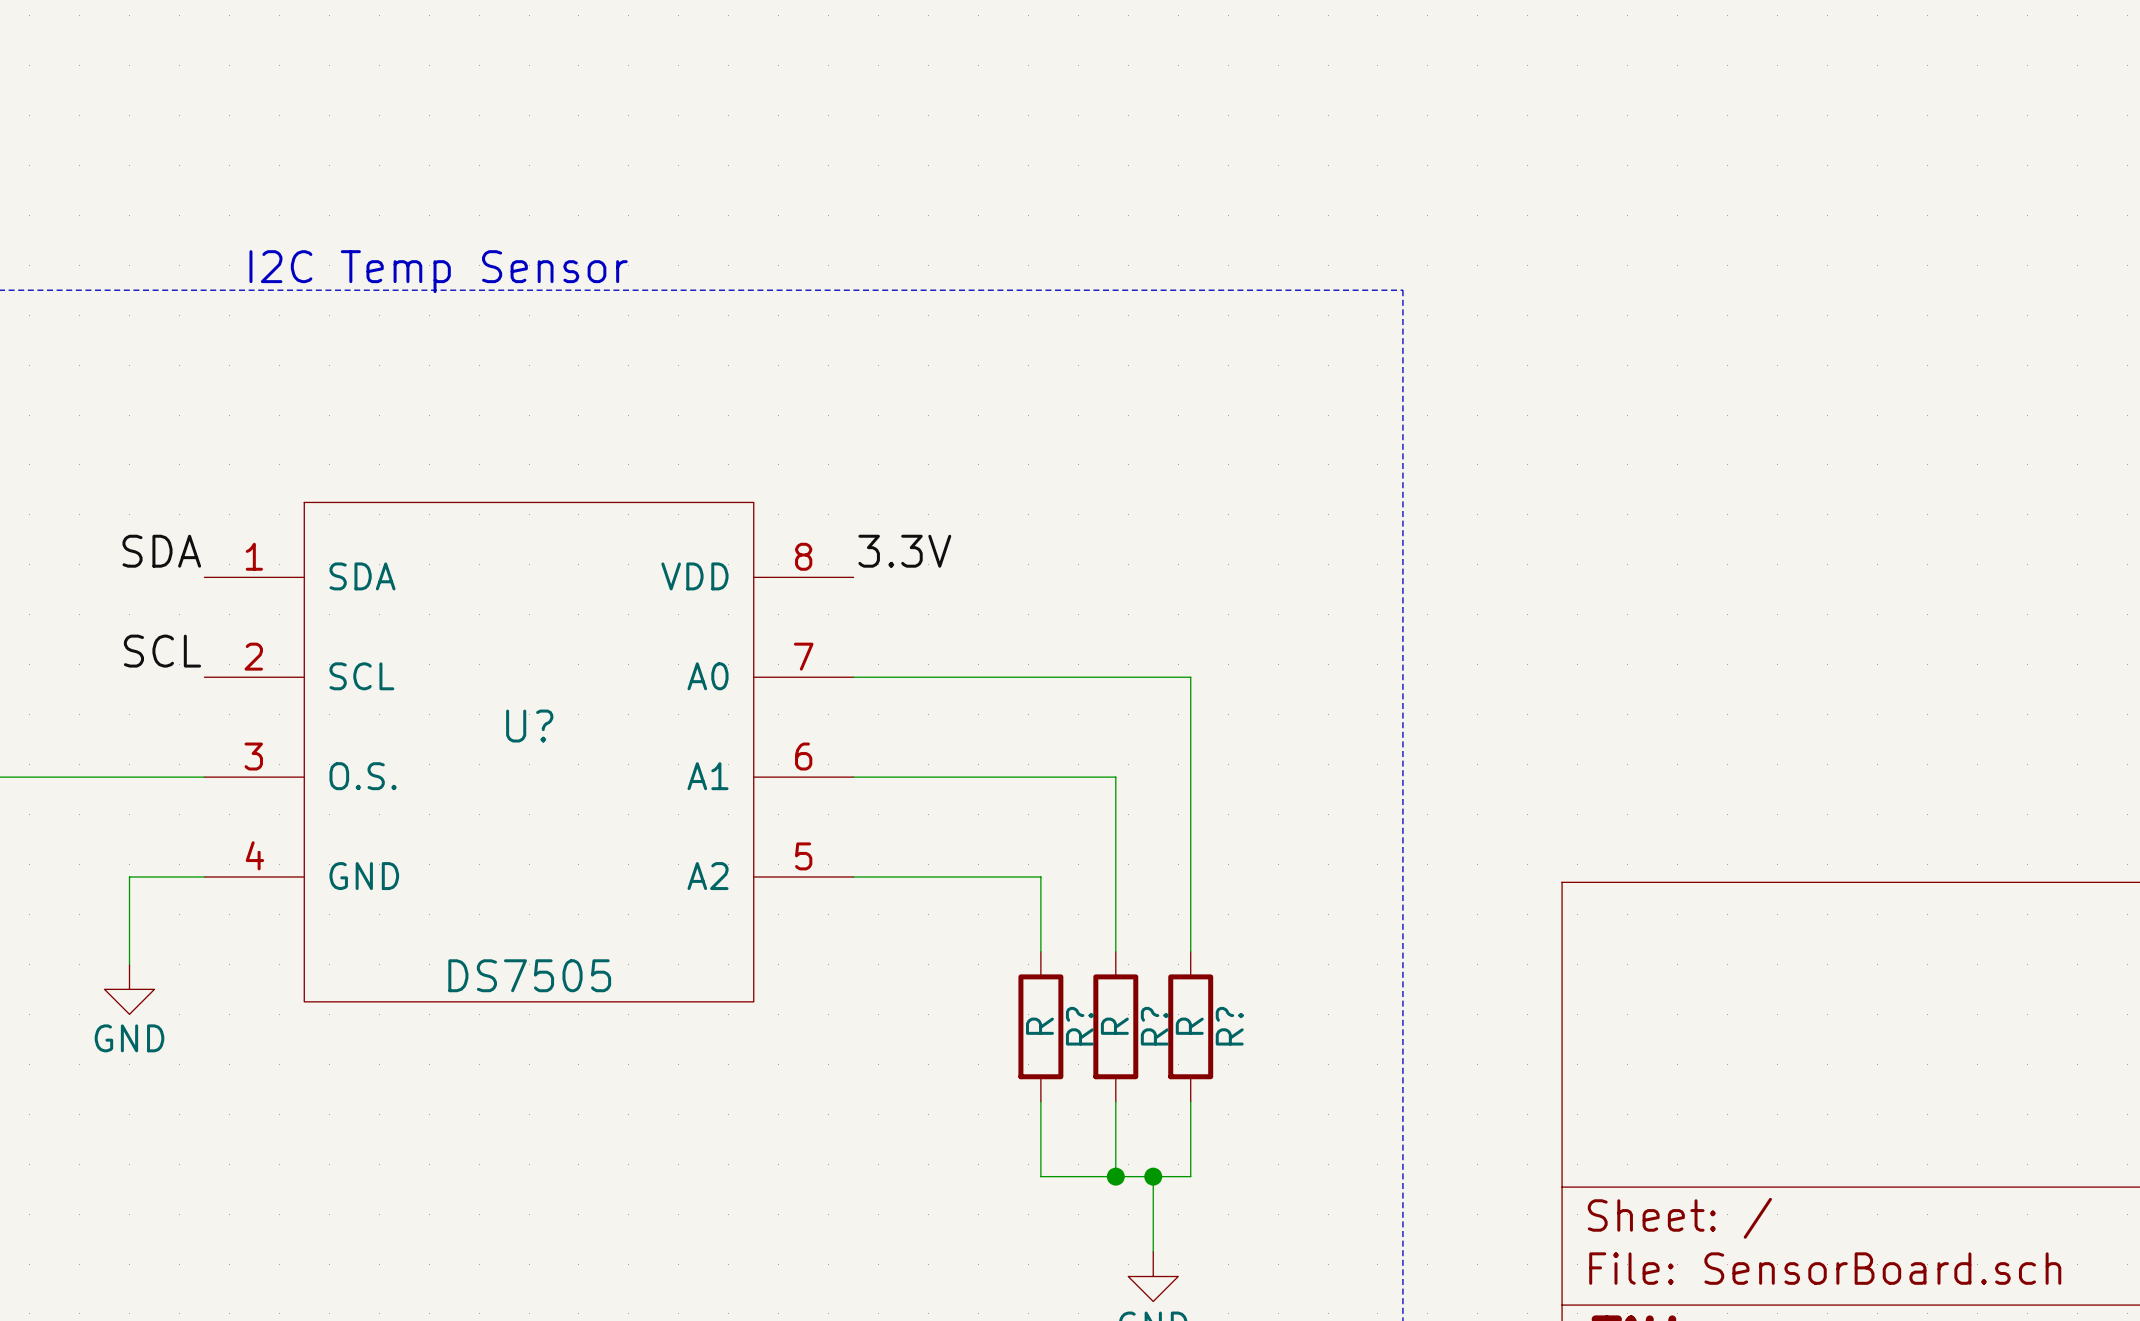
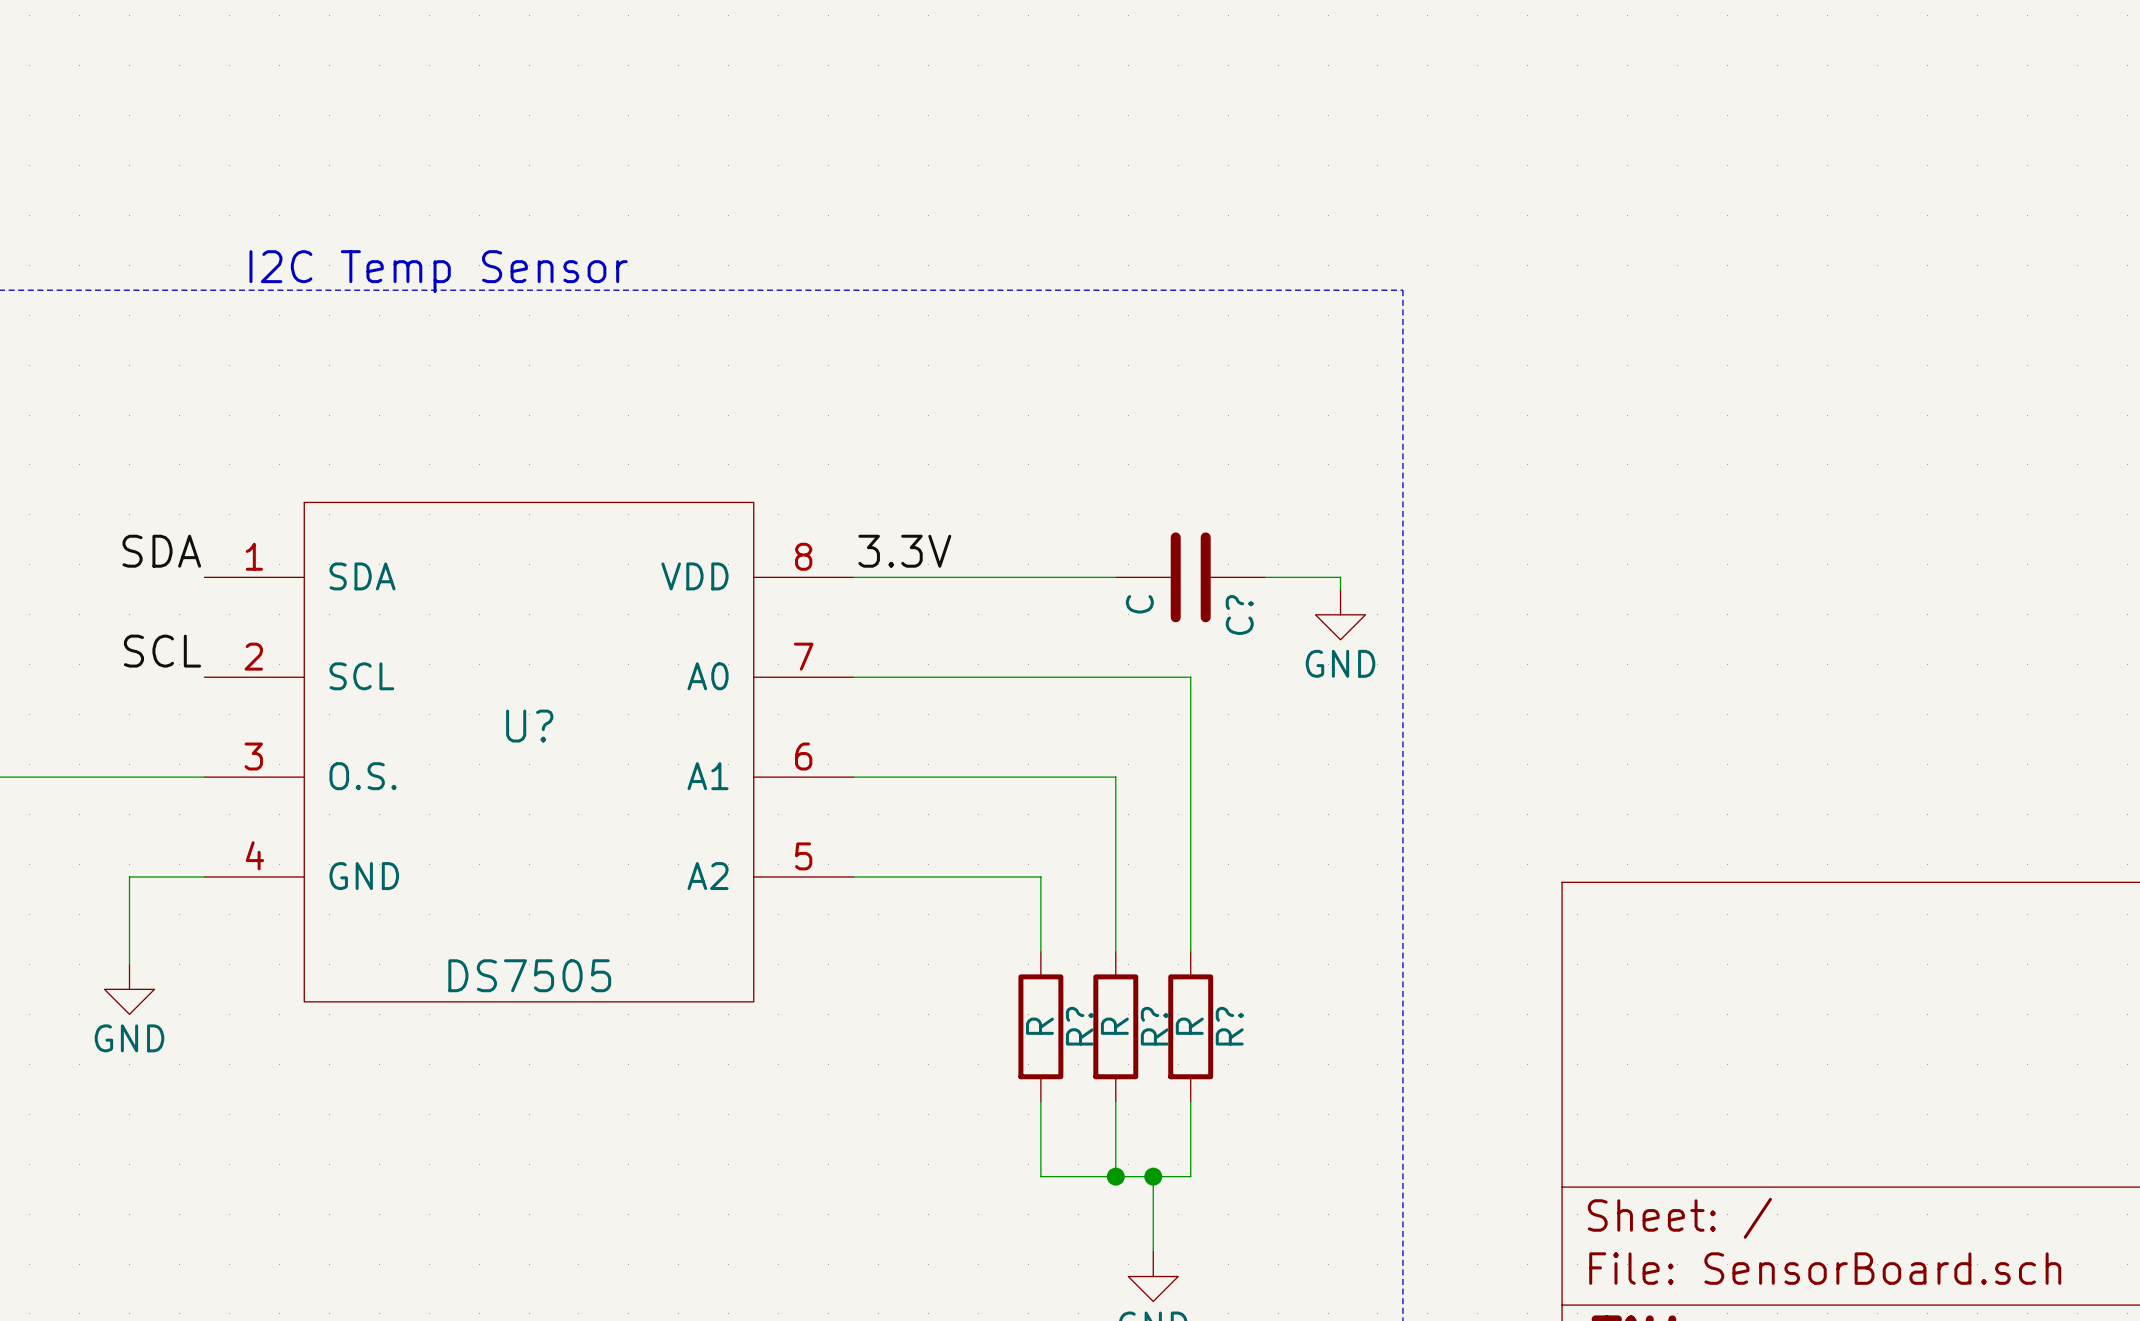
wire: none -> (853, 577) (1115, 577)
C?: none -> C (1190, 577)
wire: none -> (1265, 577) (1340, 577) (1340, 589)
power symbol: none -> GND (1340, 614)

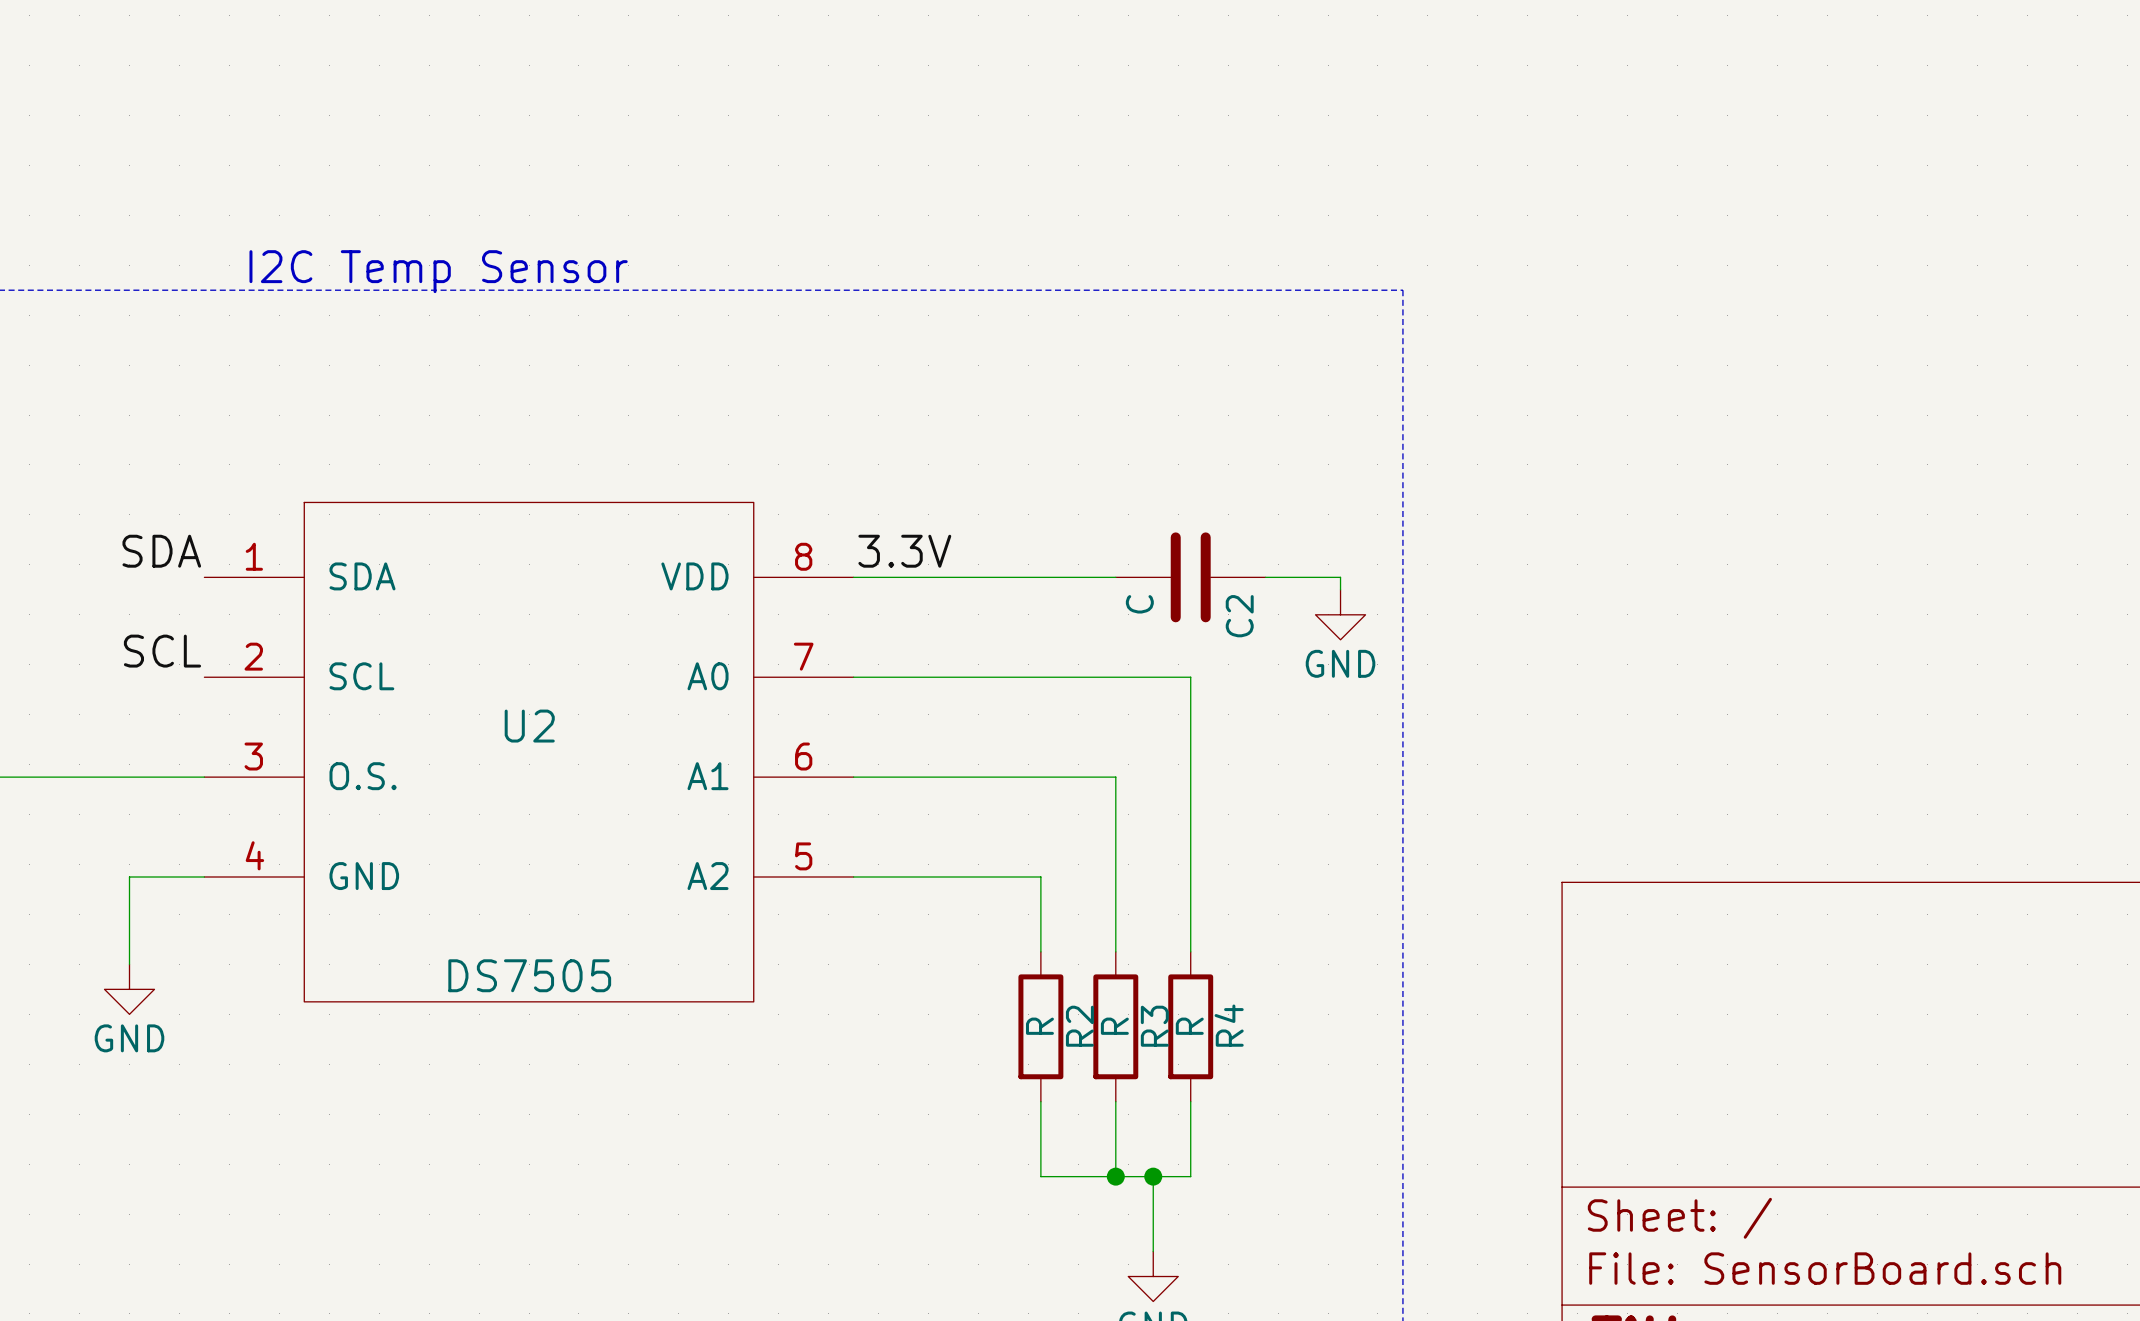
C? name: C? (1239, 615) -> C2 (1239, 616)
U? name: U? (529, 726) -> U2 (529, 726)
R? name: R? (1079, 1026) -> R2 (1079, 1026)
R? name: R? (1154, 1026) -> R3 (1154, 1026)
R? name: R? (1229, 1026) -> R4 (1229, 1025)

